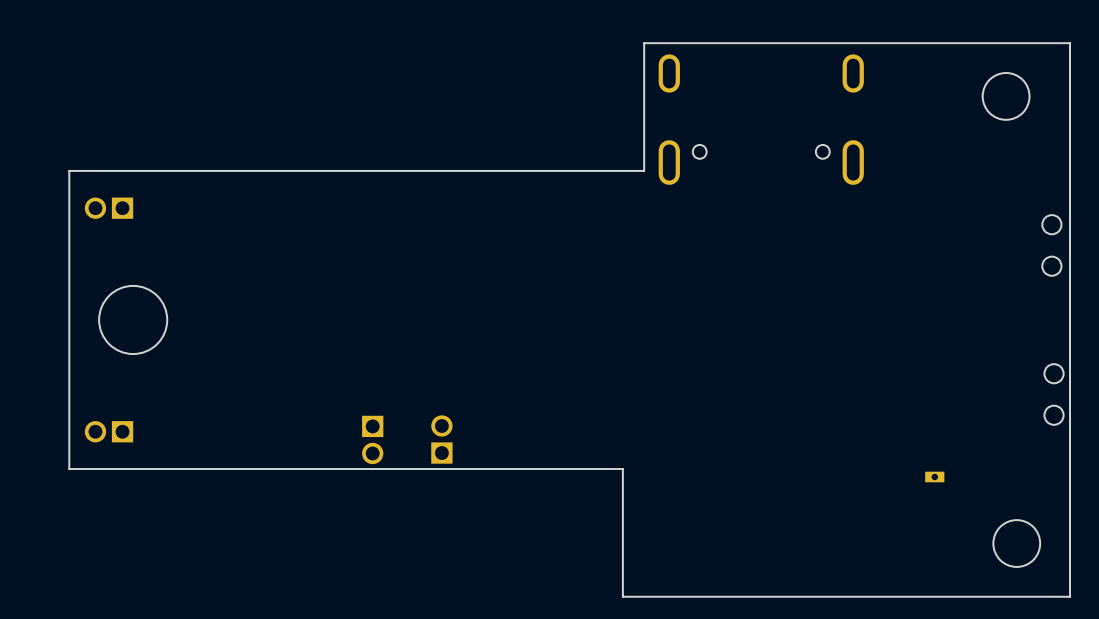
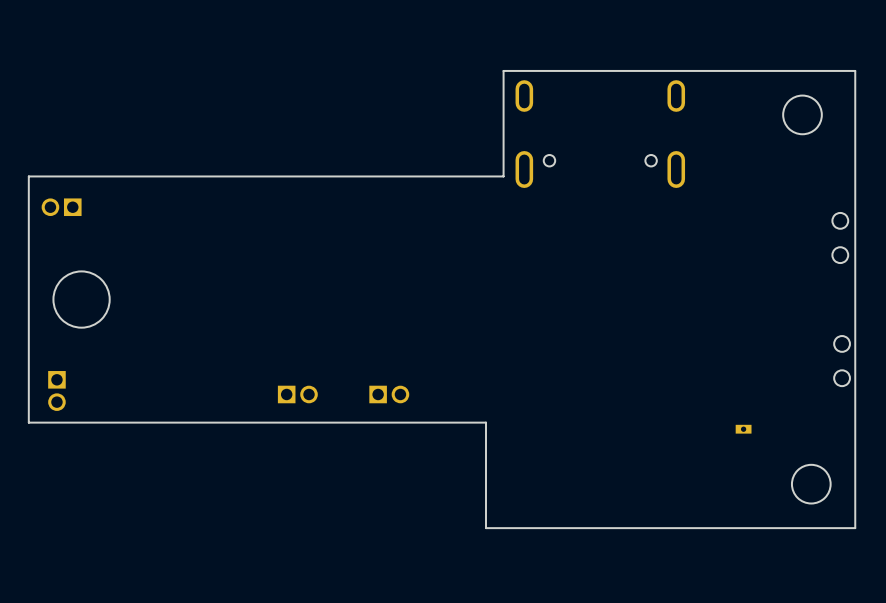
part rotation: 0° (109, 431) -> 90° counterclockwise (56, 390)
part: none -> (389, 394)
part rotation: 0° (372, 439) -> 90° counterclockwise (297, 394)
part: (441, 439) -> none

